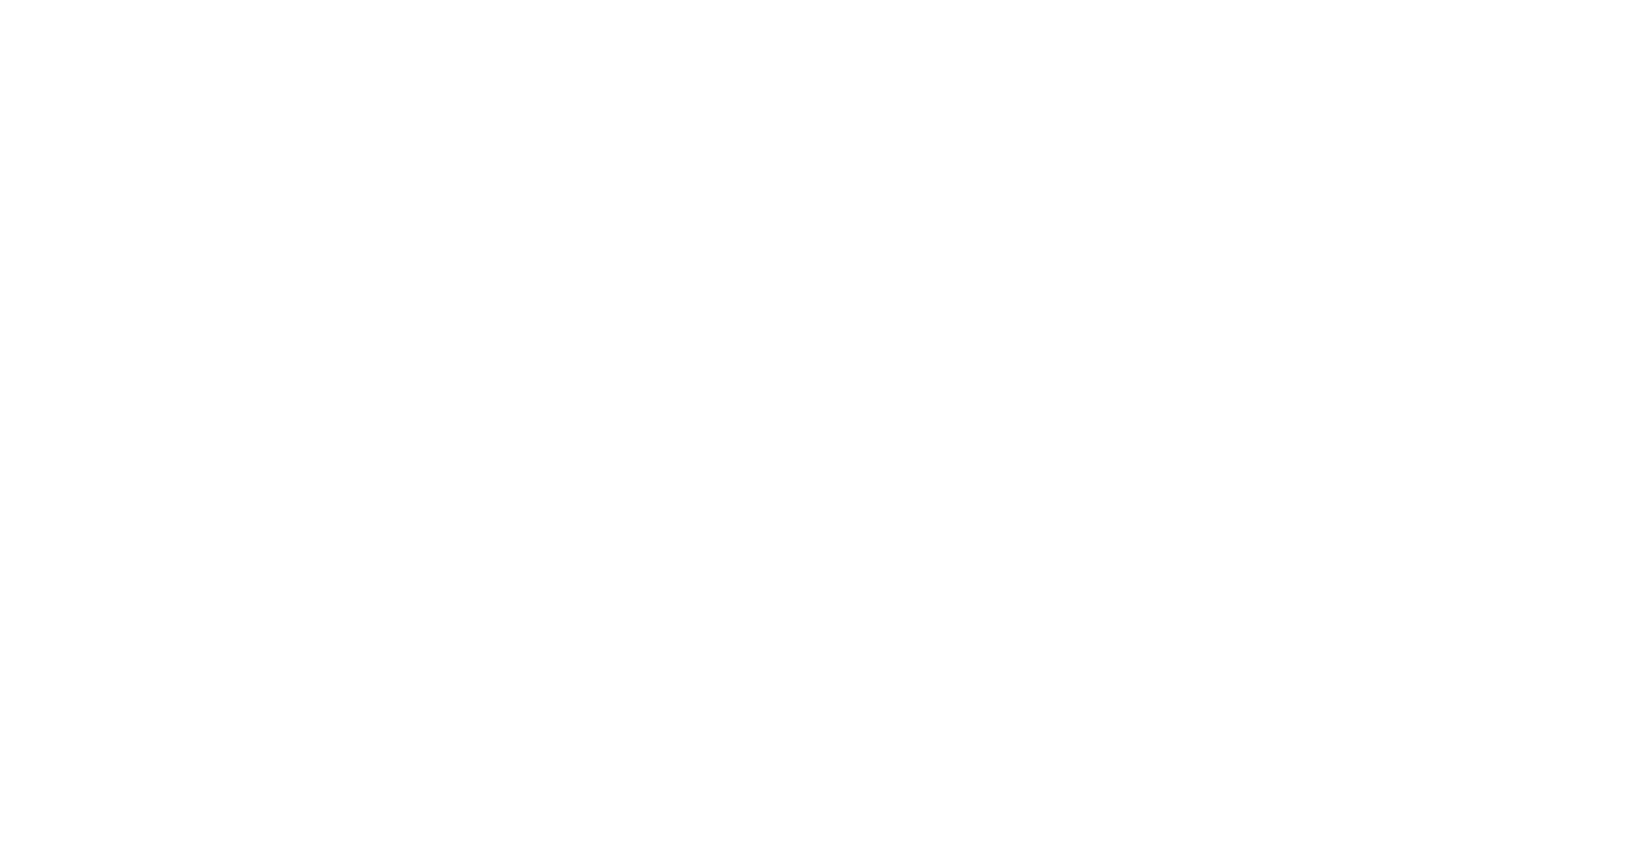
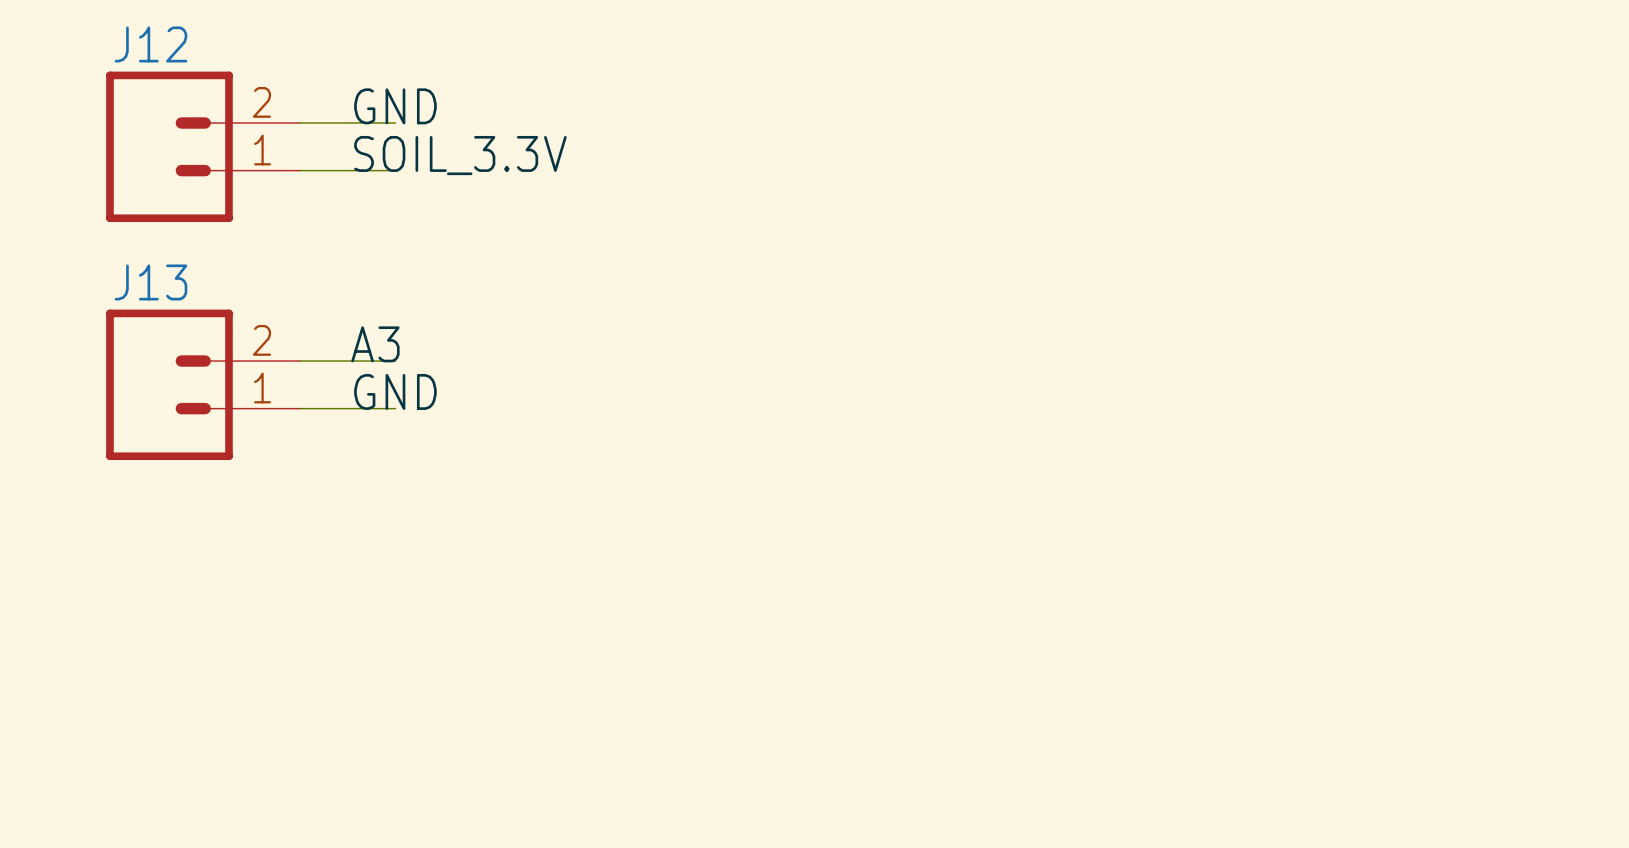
label: none -> GND (395, 106)
wire: none -> (300, 123) (395, 123)
J12: none -> (203, 146)
label: none -> SOIL_3.3V (460, 155)
wire: none -> (300, 170) (395, 170)
label: none -> A3 (375, 344)
wire: none -> (300, 361) (395, 361)
J13: none -> (203, 384)
label: none -> GND (395, 391)
wire: none -> (300, 408) (395, 408)

